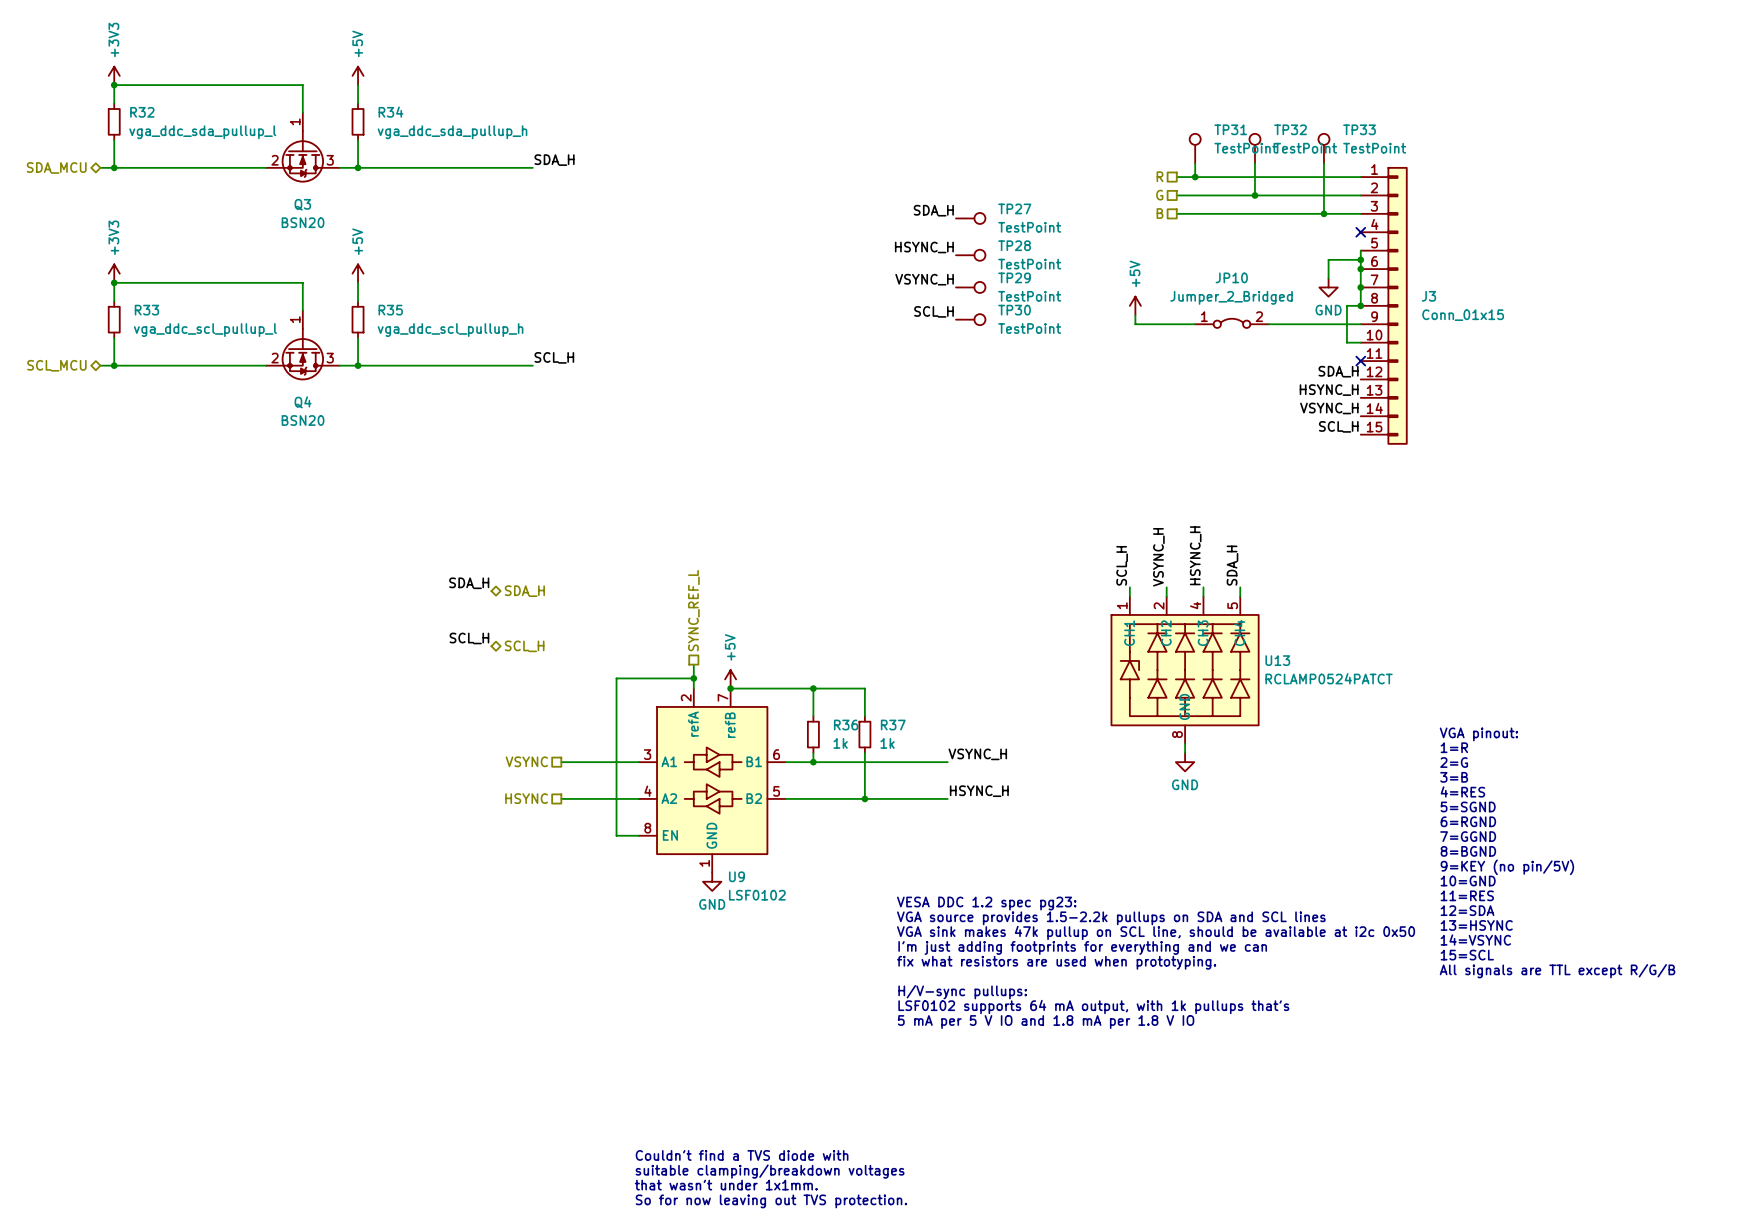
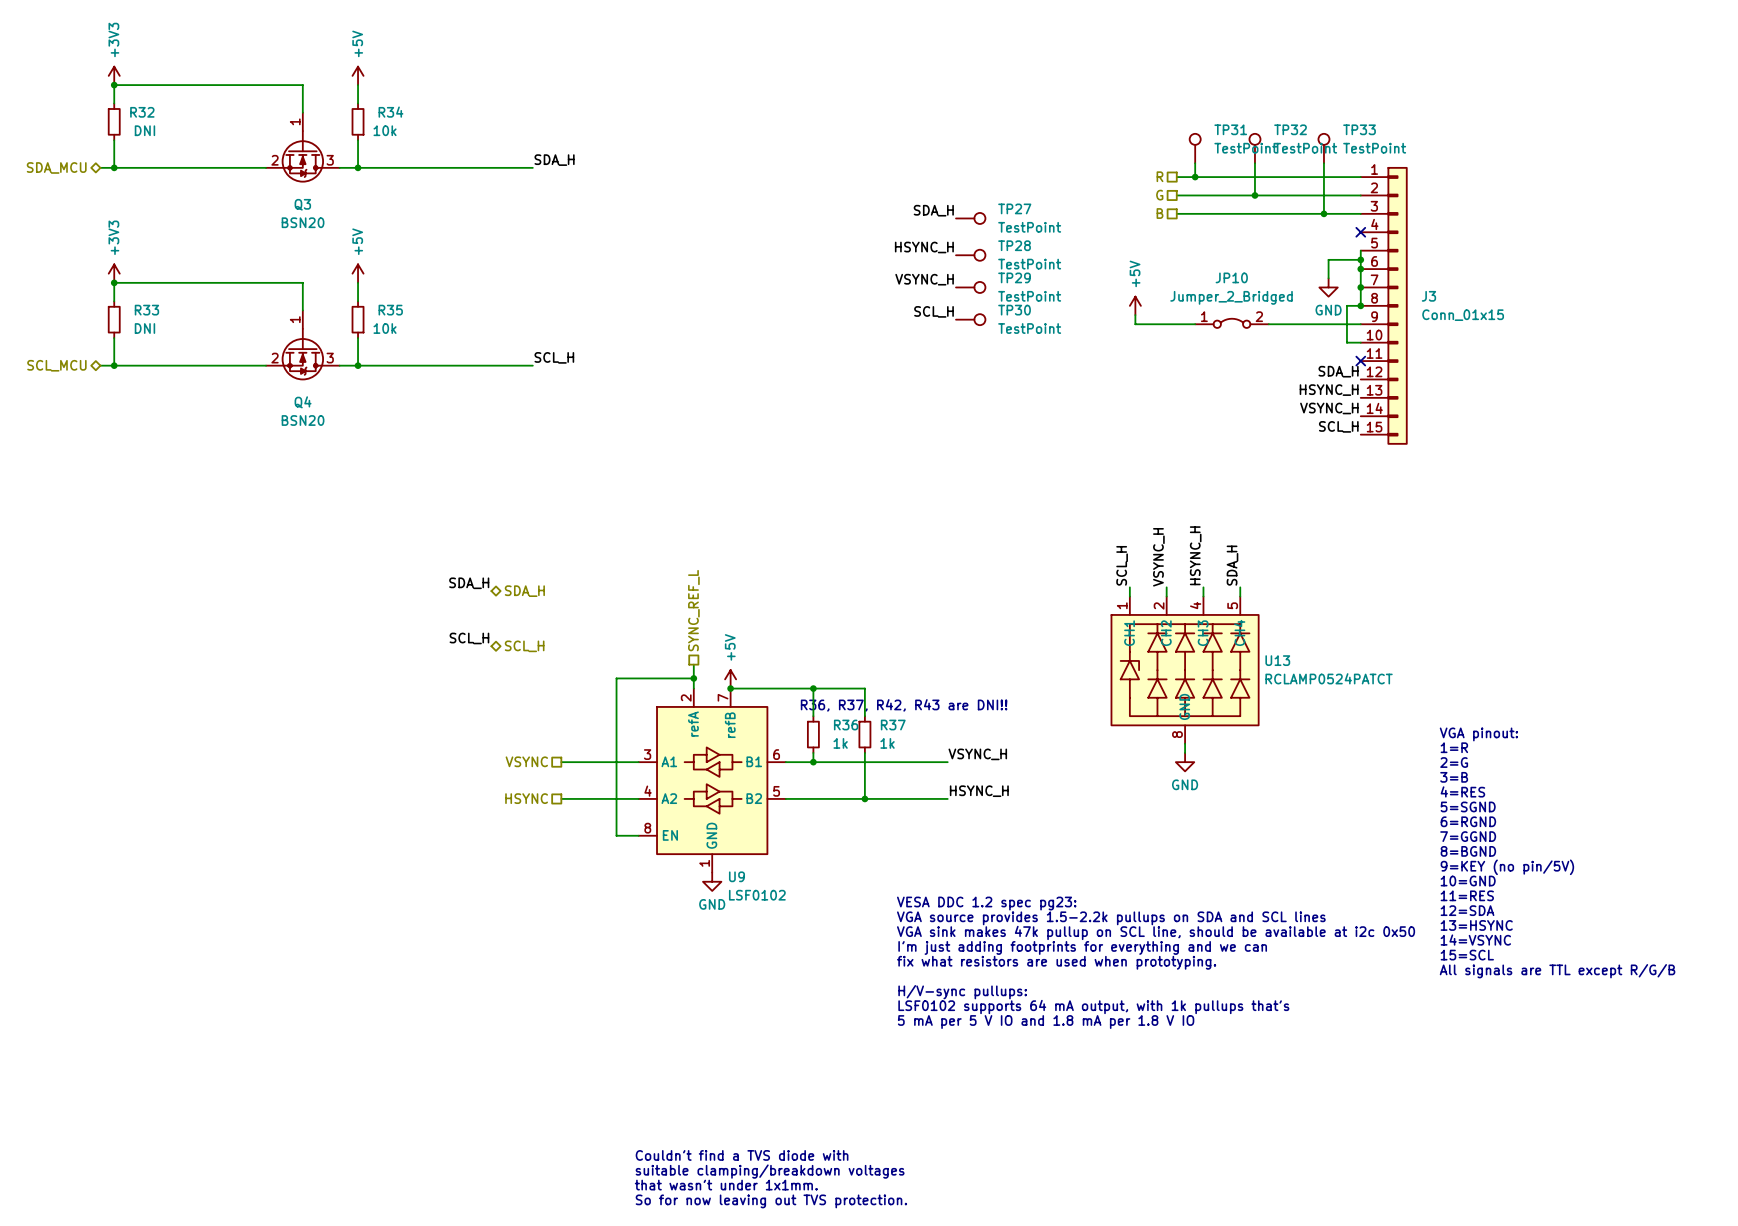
R32 value: vga_ddc_sda_pullup_l (202, 132) -> DNI (144, 130)
R34 value: vga_ddc_sda_pullup_h (452, 132) -> 10k (385, 130)
R33 value: vga_ddc_scl_pullup_l (205, 330) -> DNI (144, 328)
R35 value: vga_ddc_scl_pullup_h (450, 330) -> 10k (385, 328)
text: none -> R36, R37, R42, R43 are DNI!! (904, 705)

